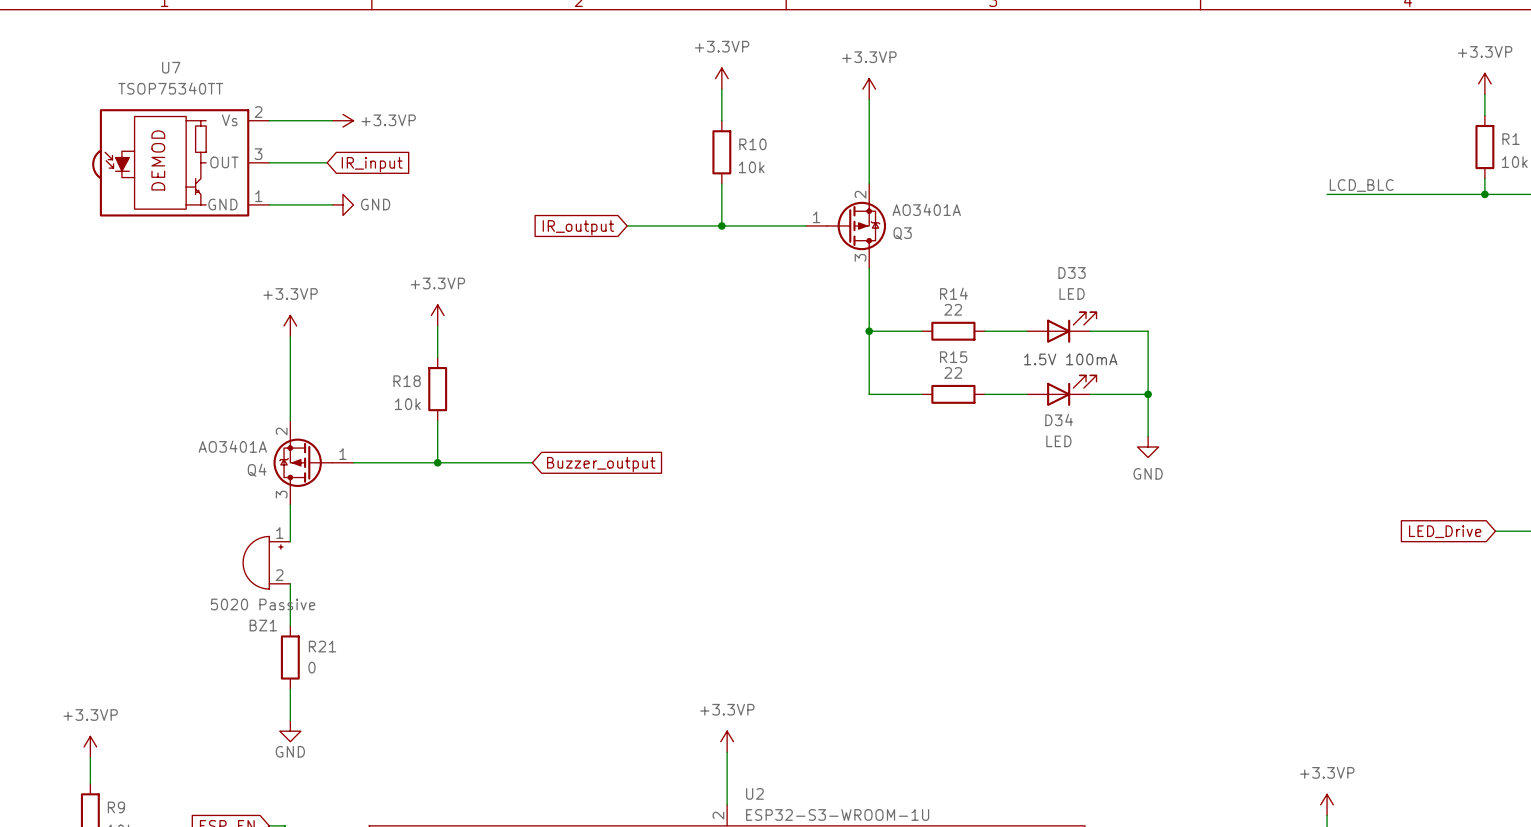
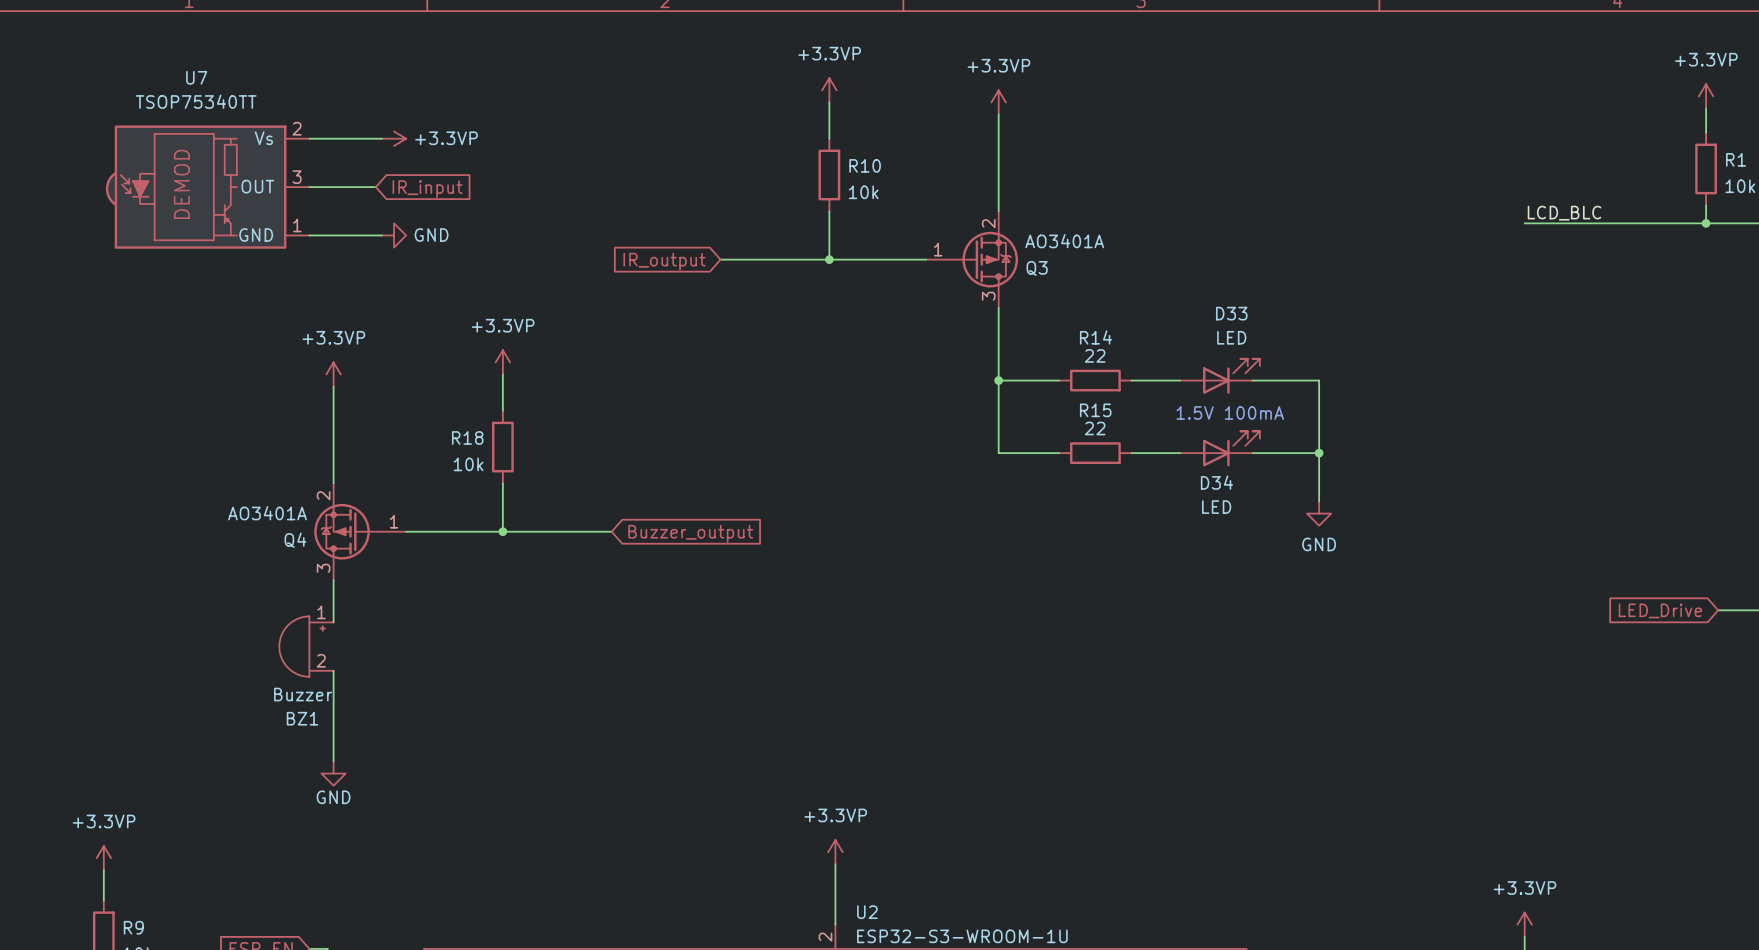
BZ1 value: 5020 Passive (263, 604) -> Buzzer (303, 694)
wire: none -> (333, 719) (333, 761)
R21: 0 (290, 657) -> none
wire: (290, 689) (290, 720) -> none
power symbol position: GND (290, 731) -> GND (333, 773)

